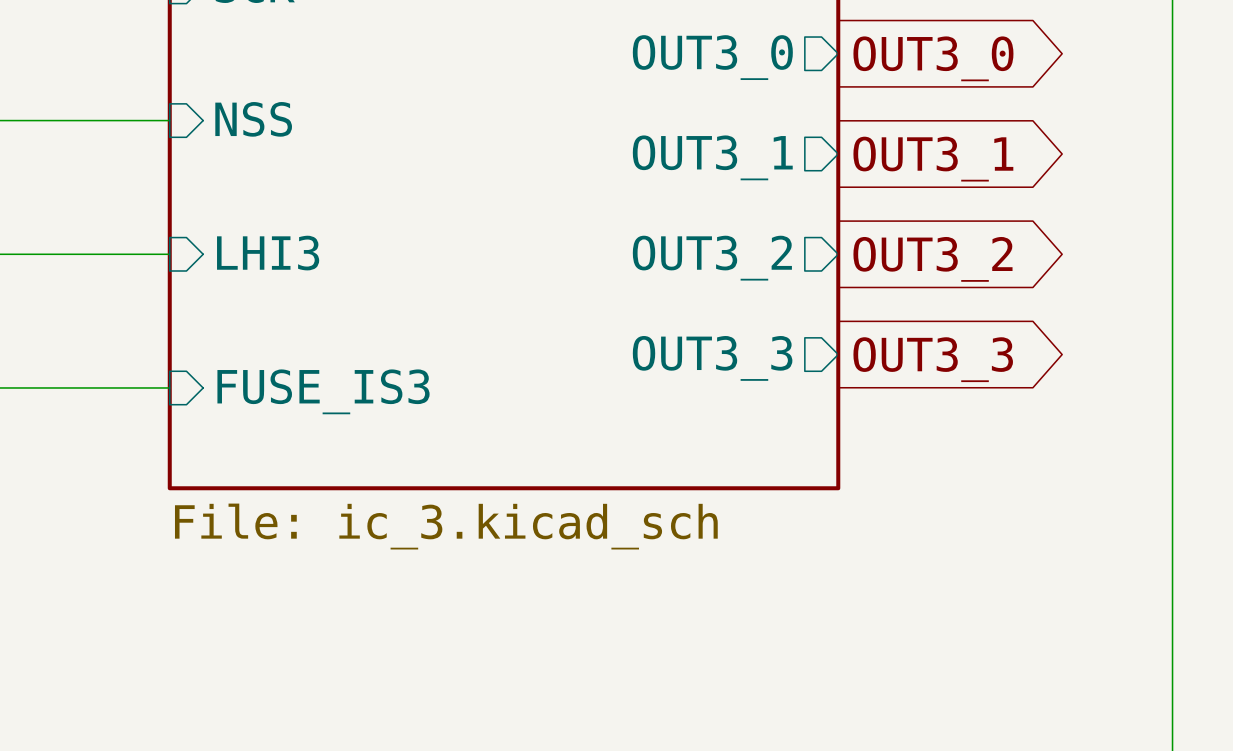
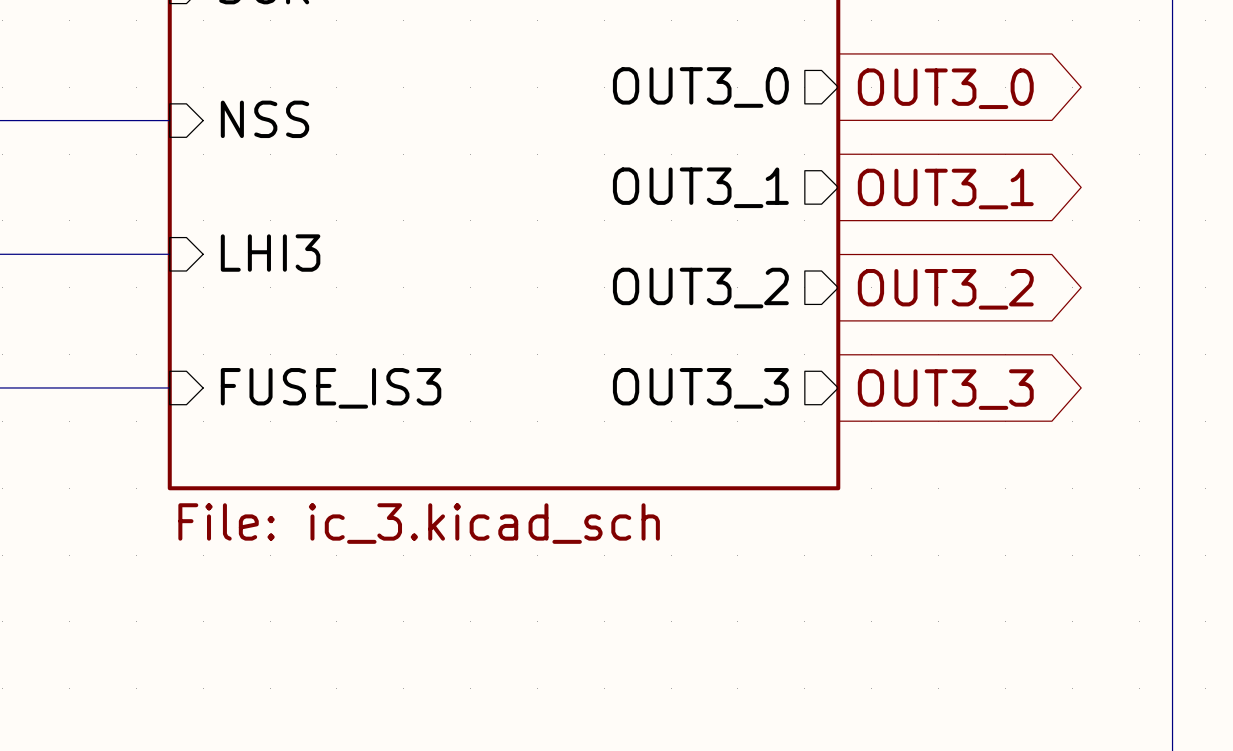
sheet pin position: OUT3_0 (712, 57) -> OUT3_0 (700, 87)
global label position: OUT3_0 (933, 58) -> OUT3_0 (945, 88)
sheet pin position: OUT3_1 (712, 157) -> OUT3_1 (700, 187)
global label position: OUT3_1 (933, 159) -> OUT3_1 (945, 189)
sheet pin position: OUT3_2 (712, 258) -> OUT3_2 (700, 288)
global label position: OUT3_2 (932, 259) -> OUT3_2 (945, 289)
sheet pin position: OUT3_3 (712, 358) -> OUT3_3 (700, 388)
global label position: OUT3_3 (933, 359) -> OUT3_3 (945, 389)

